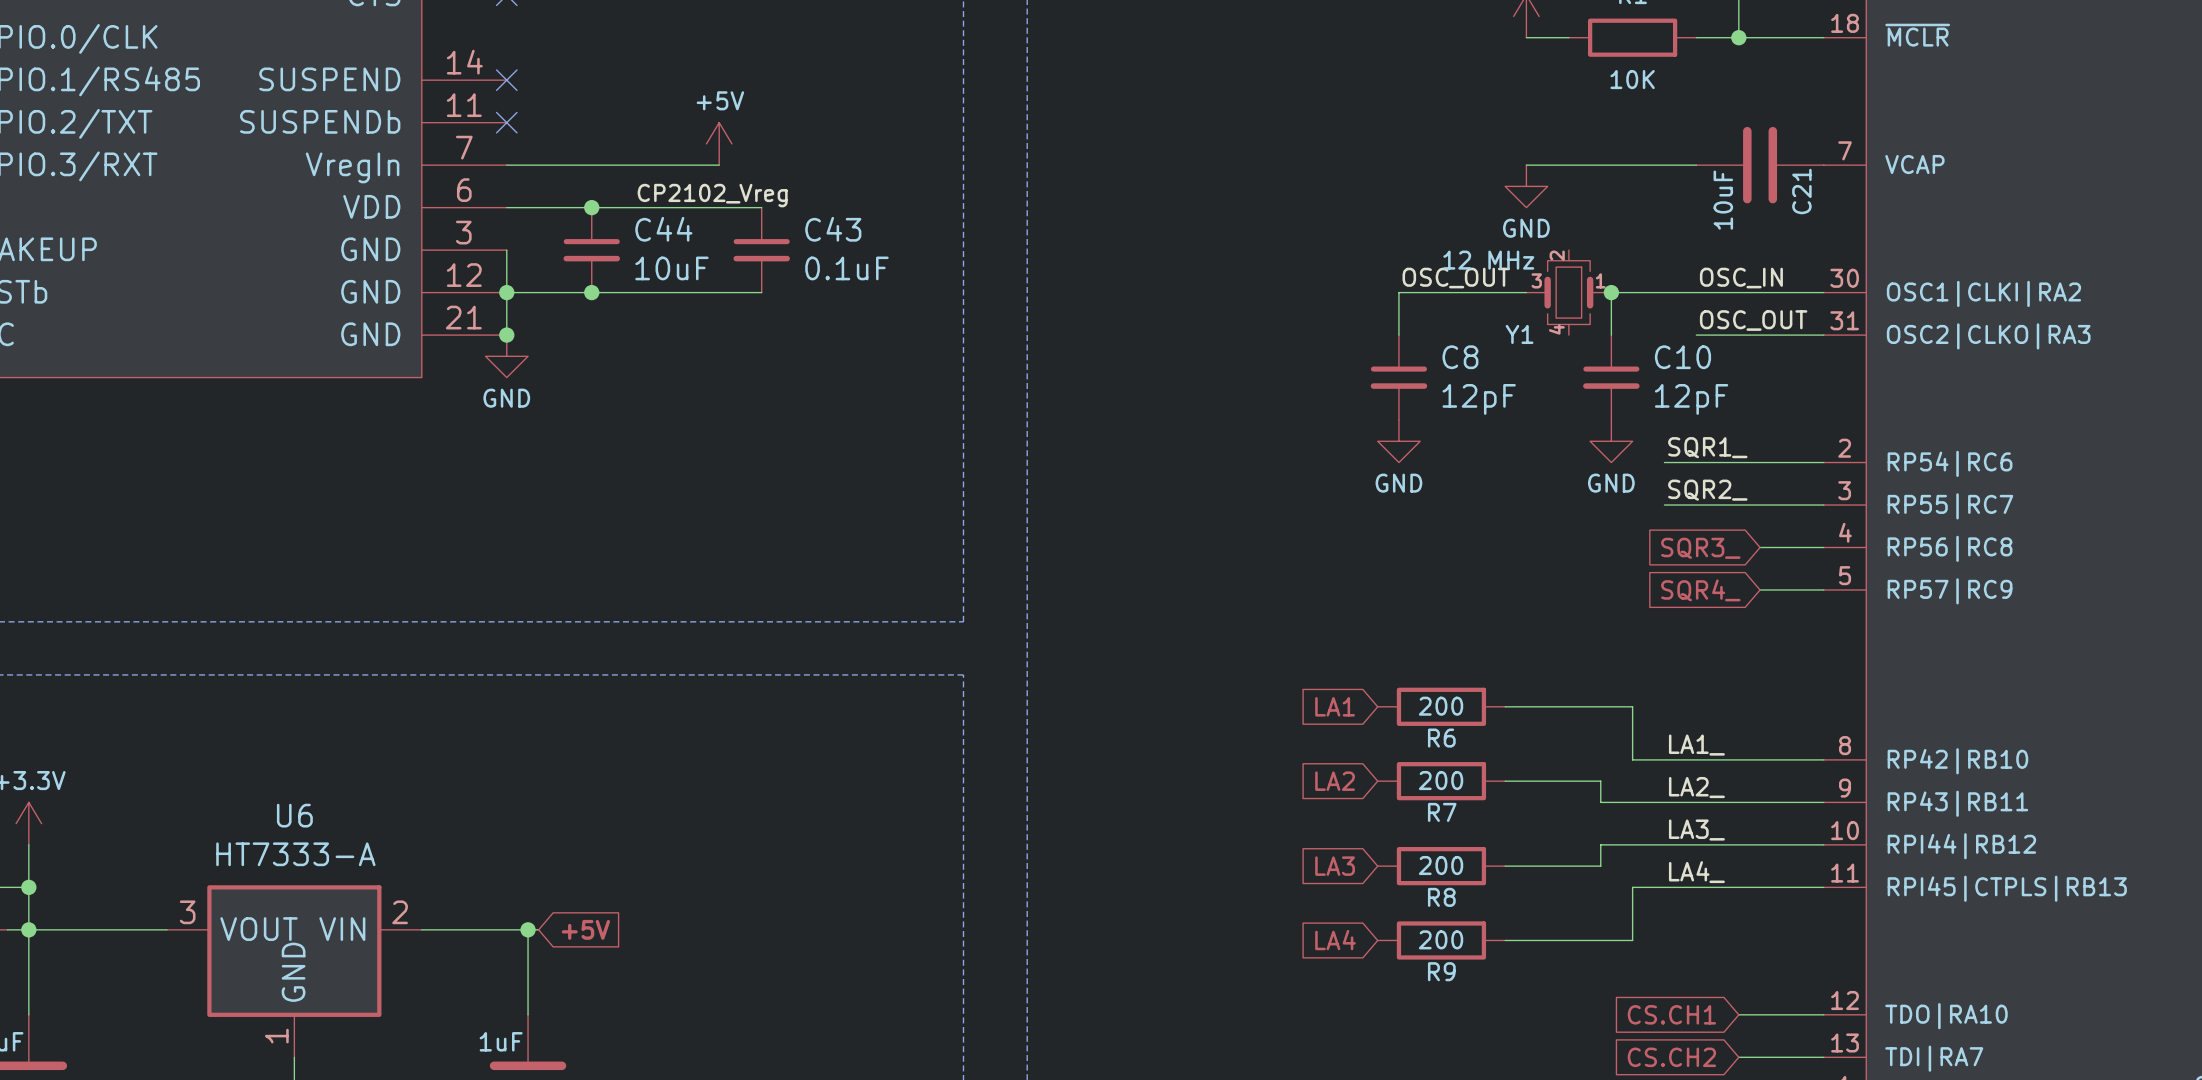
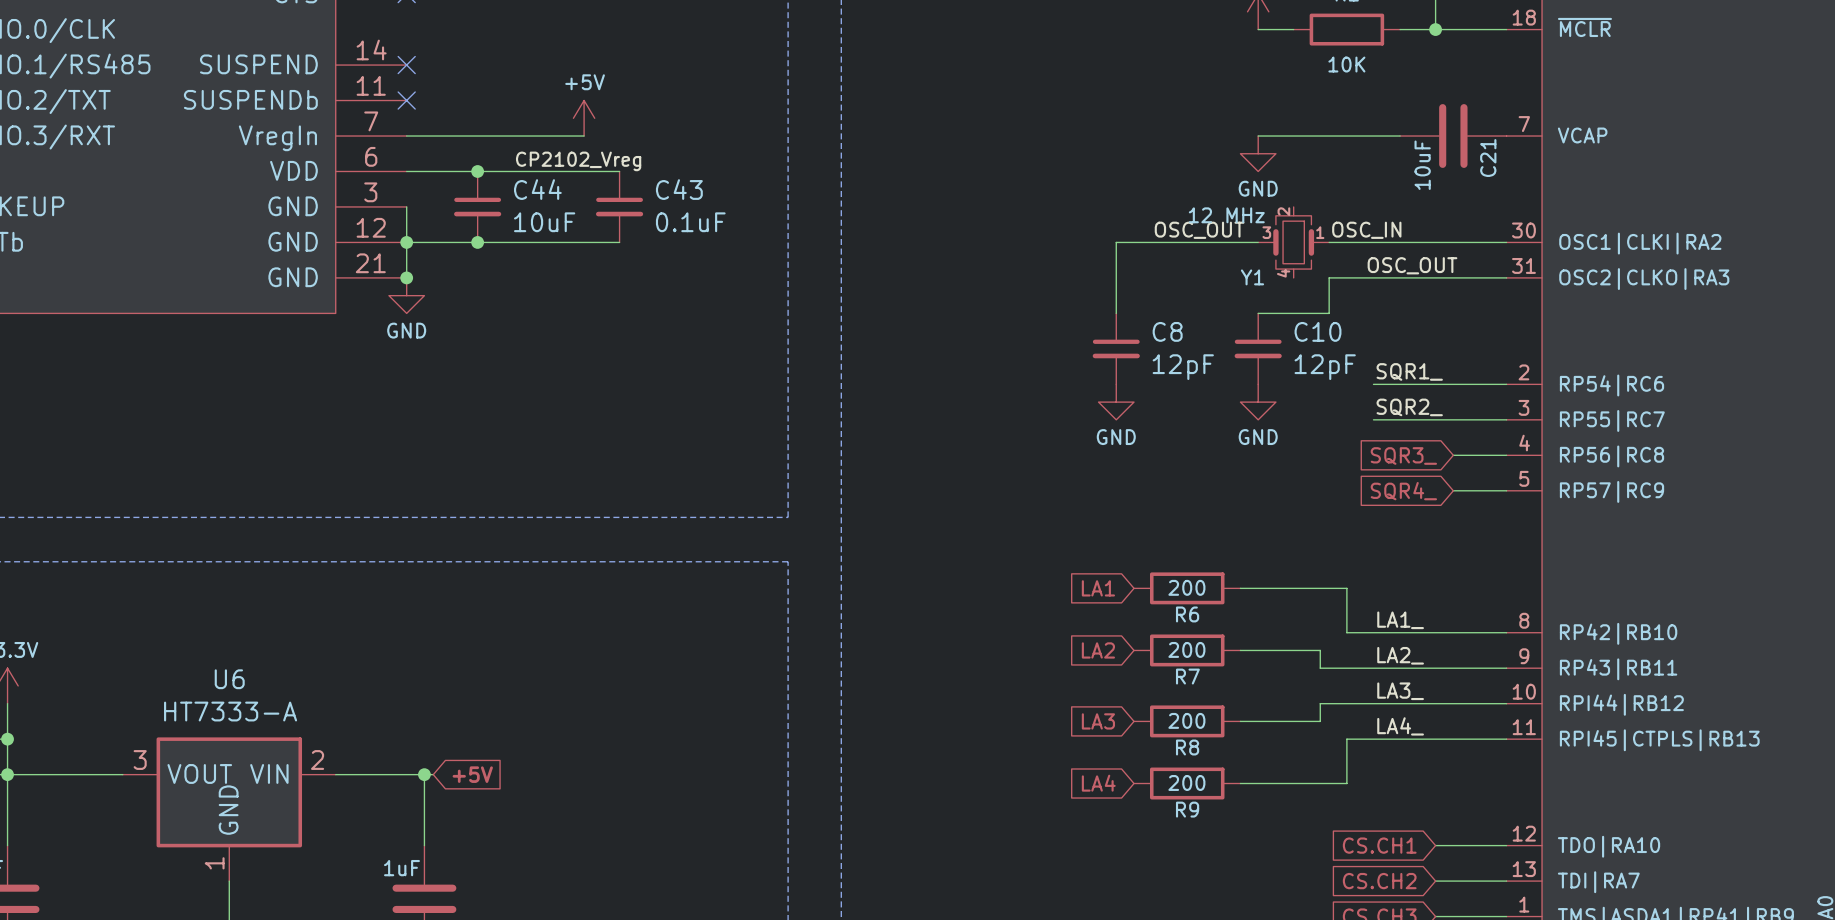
label position: OSC_IN (1741, 278) -> OSC_IN (1366, 230)
wire: (1398, 292) (1398, 335) -> (1151, 242) (1116, 242) (1116, 313)
wire: (1611, 292) (1611, 335) -> none
junction: (1611, 292) -> none
label position: OSC_OUT (1753, 320) -> OSC_OUT (1412, 265)
wire: none -> (1400, 277) (1329, 277) (1329, 313) (1258, 313)
C8 position: (1398, 377) -> (1116, 348)
C10 position: (1611, 377) -> (1258, 348)
power symbol position: GND (1398, 441) -> GND (1116, 402)
power symbol: GND (1611, 441) -> none
power symbol: none -> GND (1258, 402)

